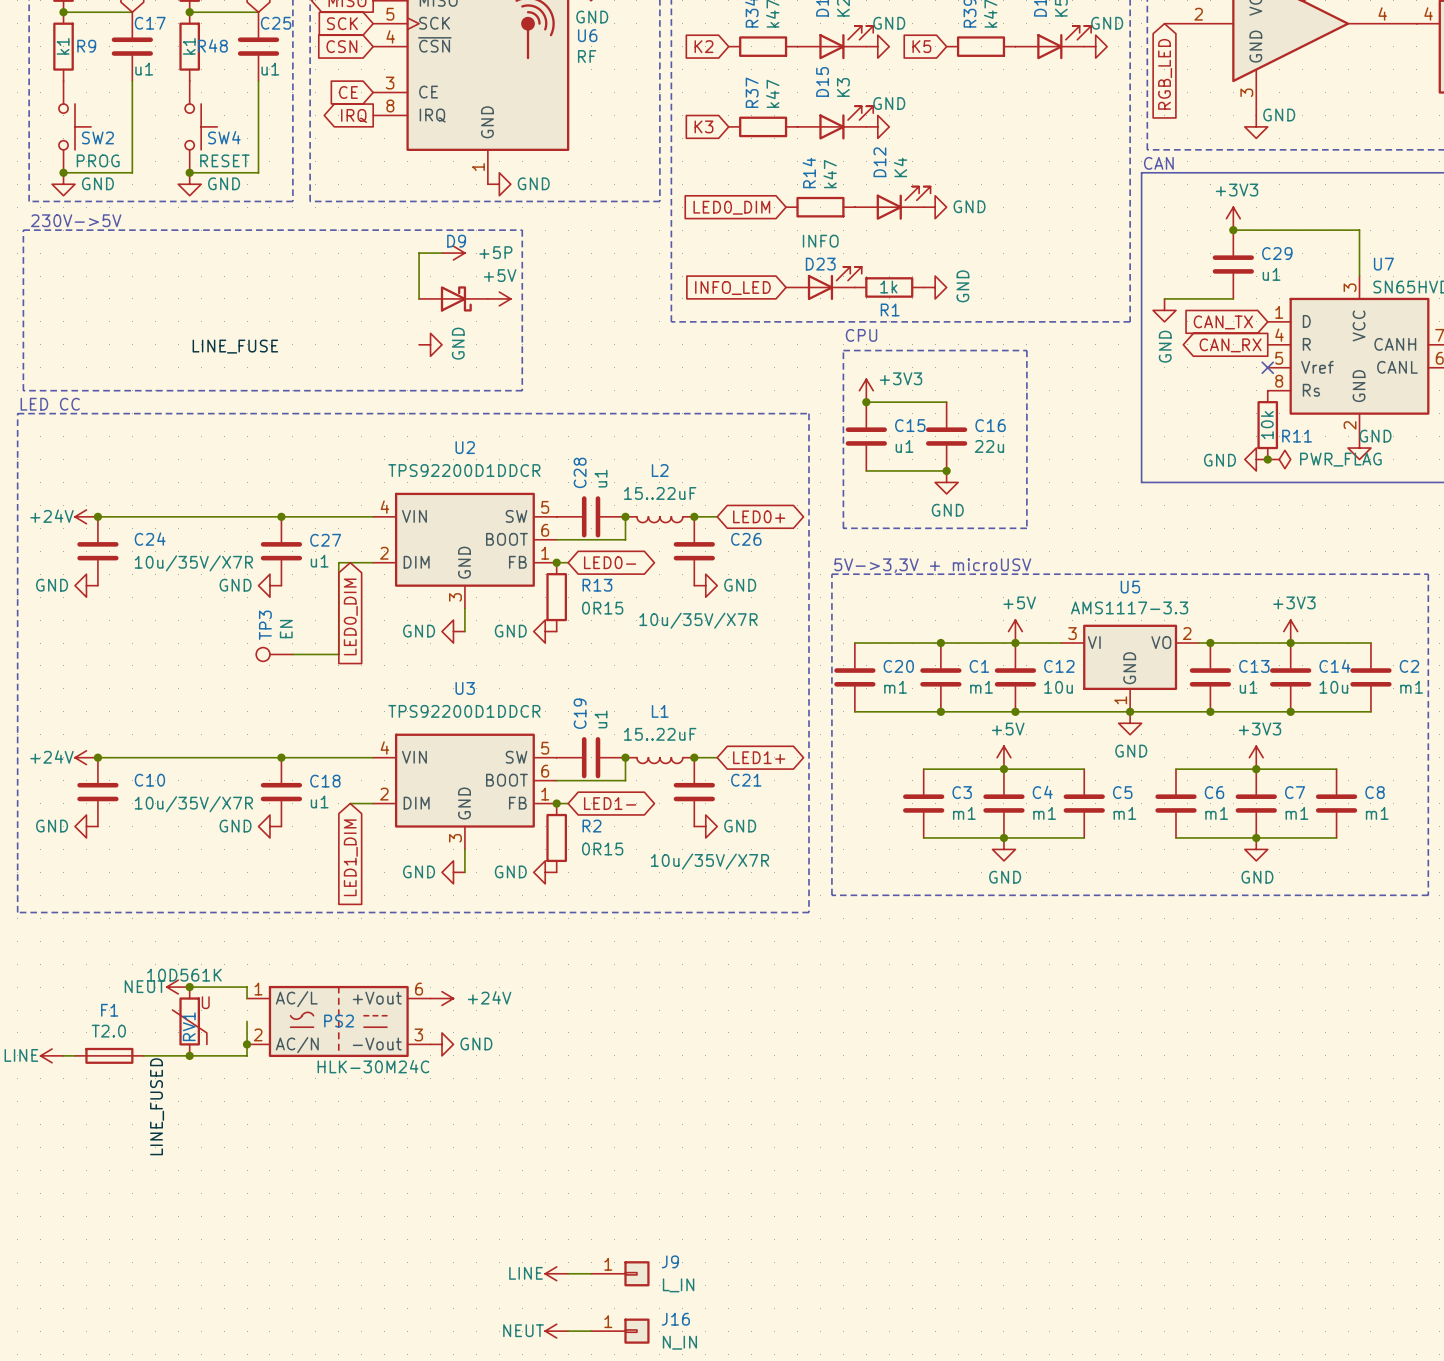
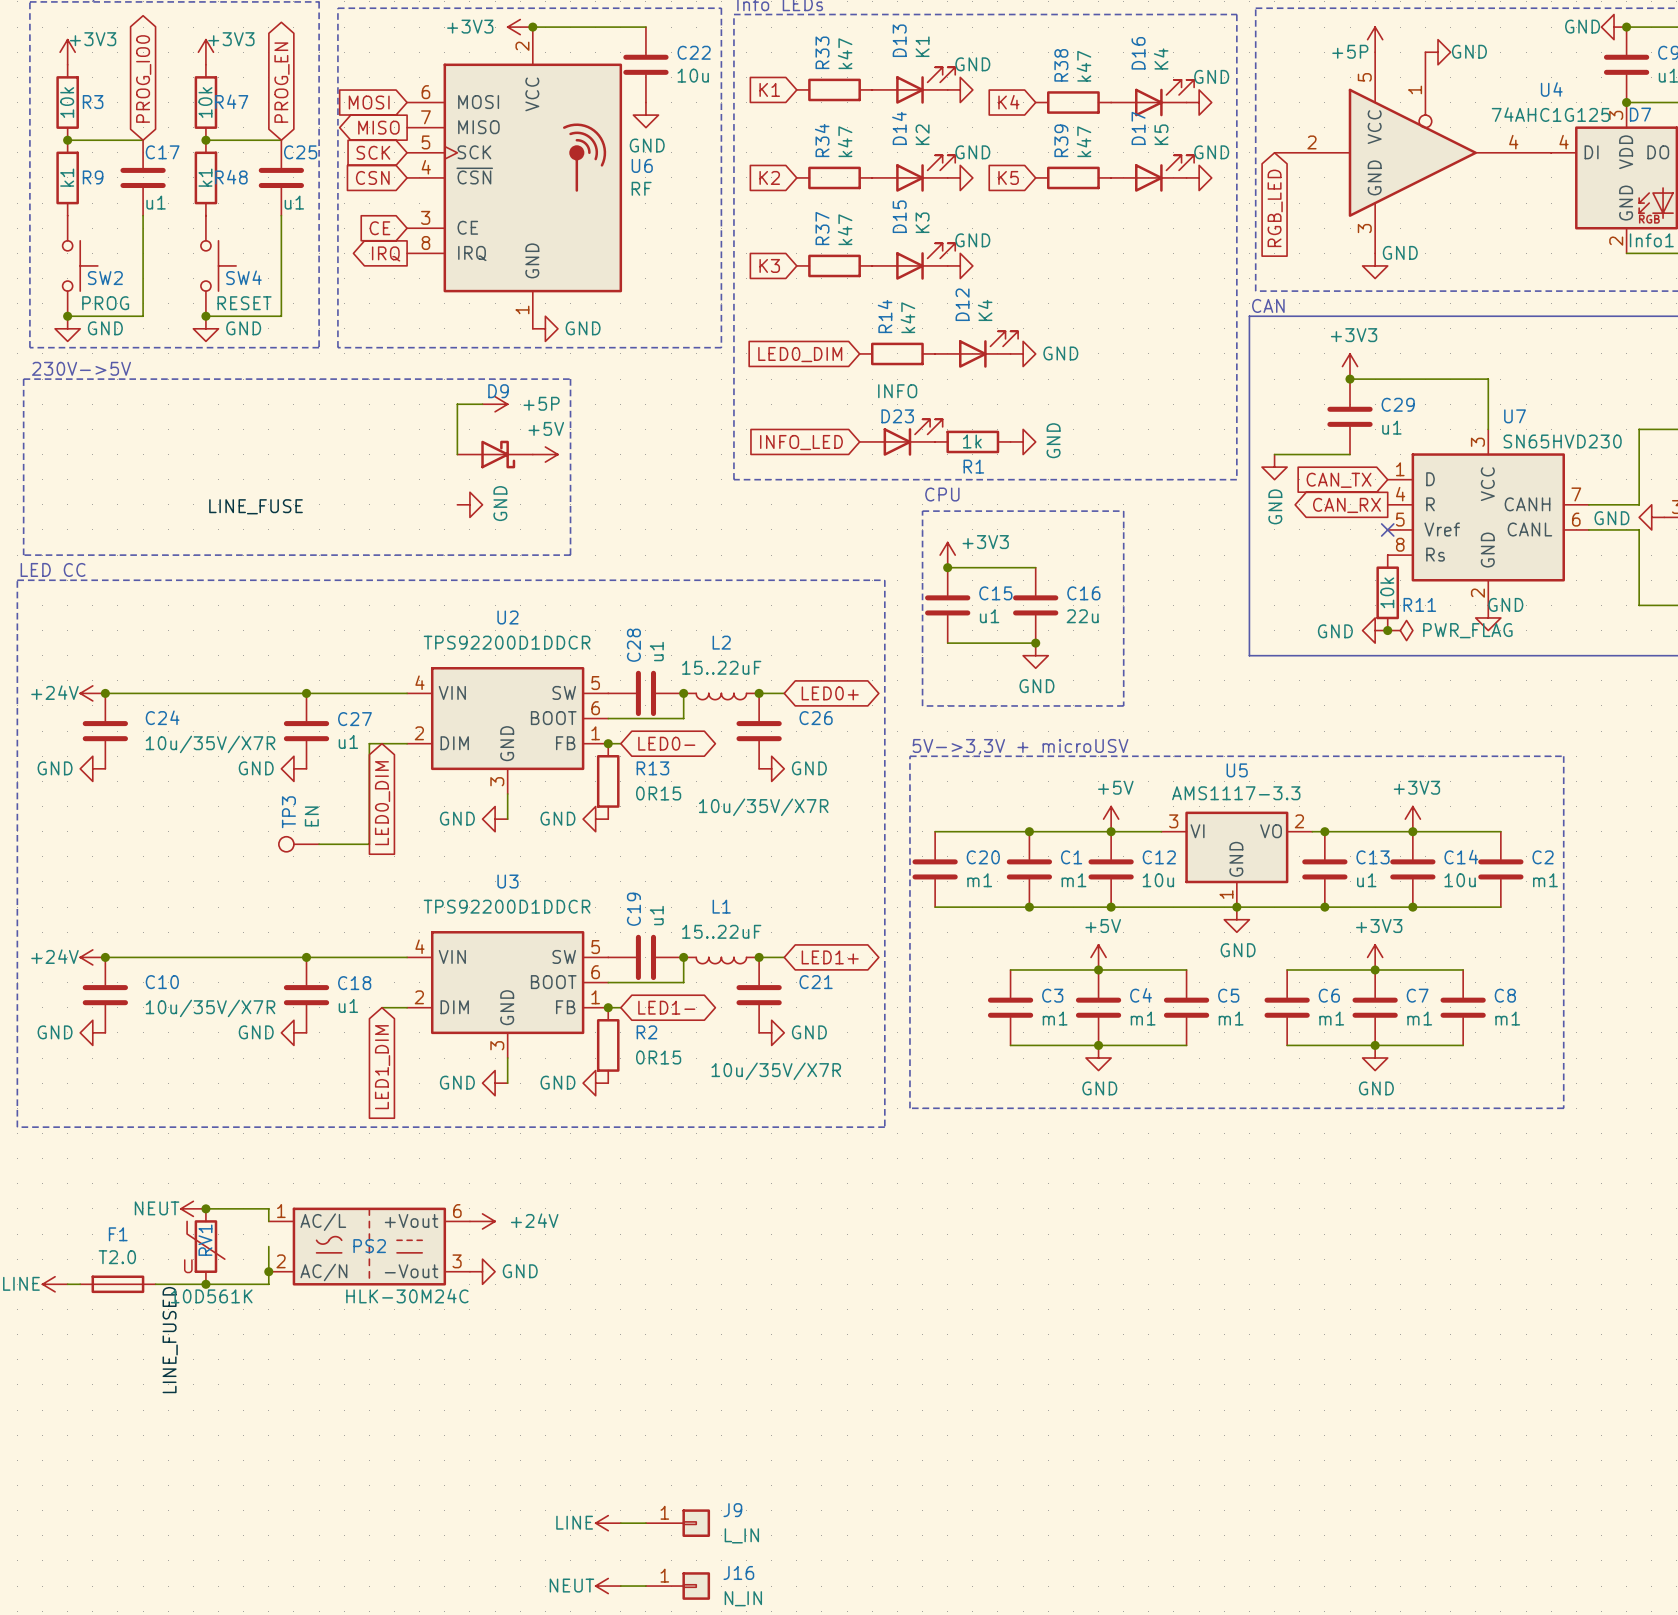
RV1 rotation: 0° (189, 1021) -> 180° (205, 1246)

